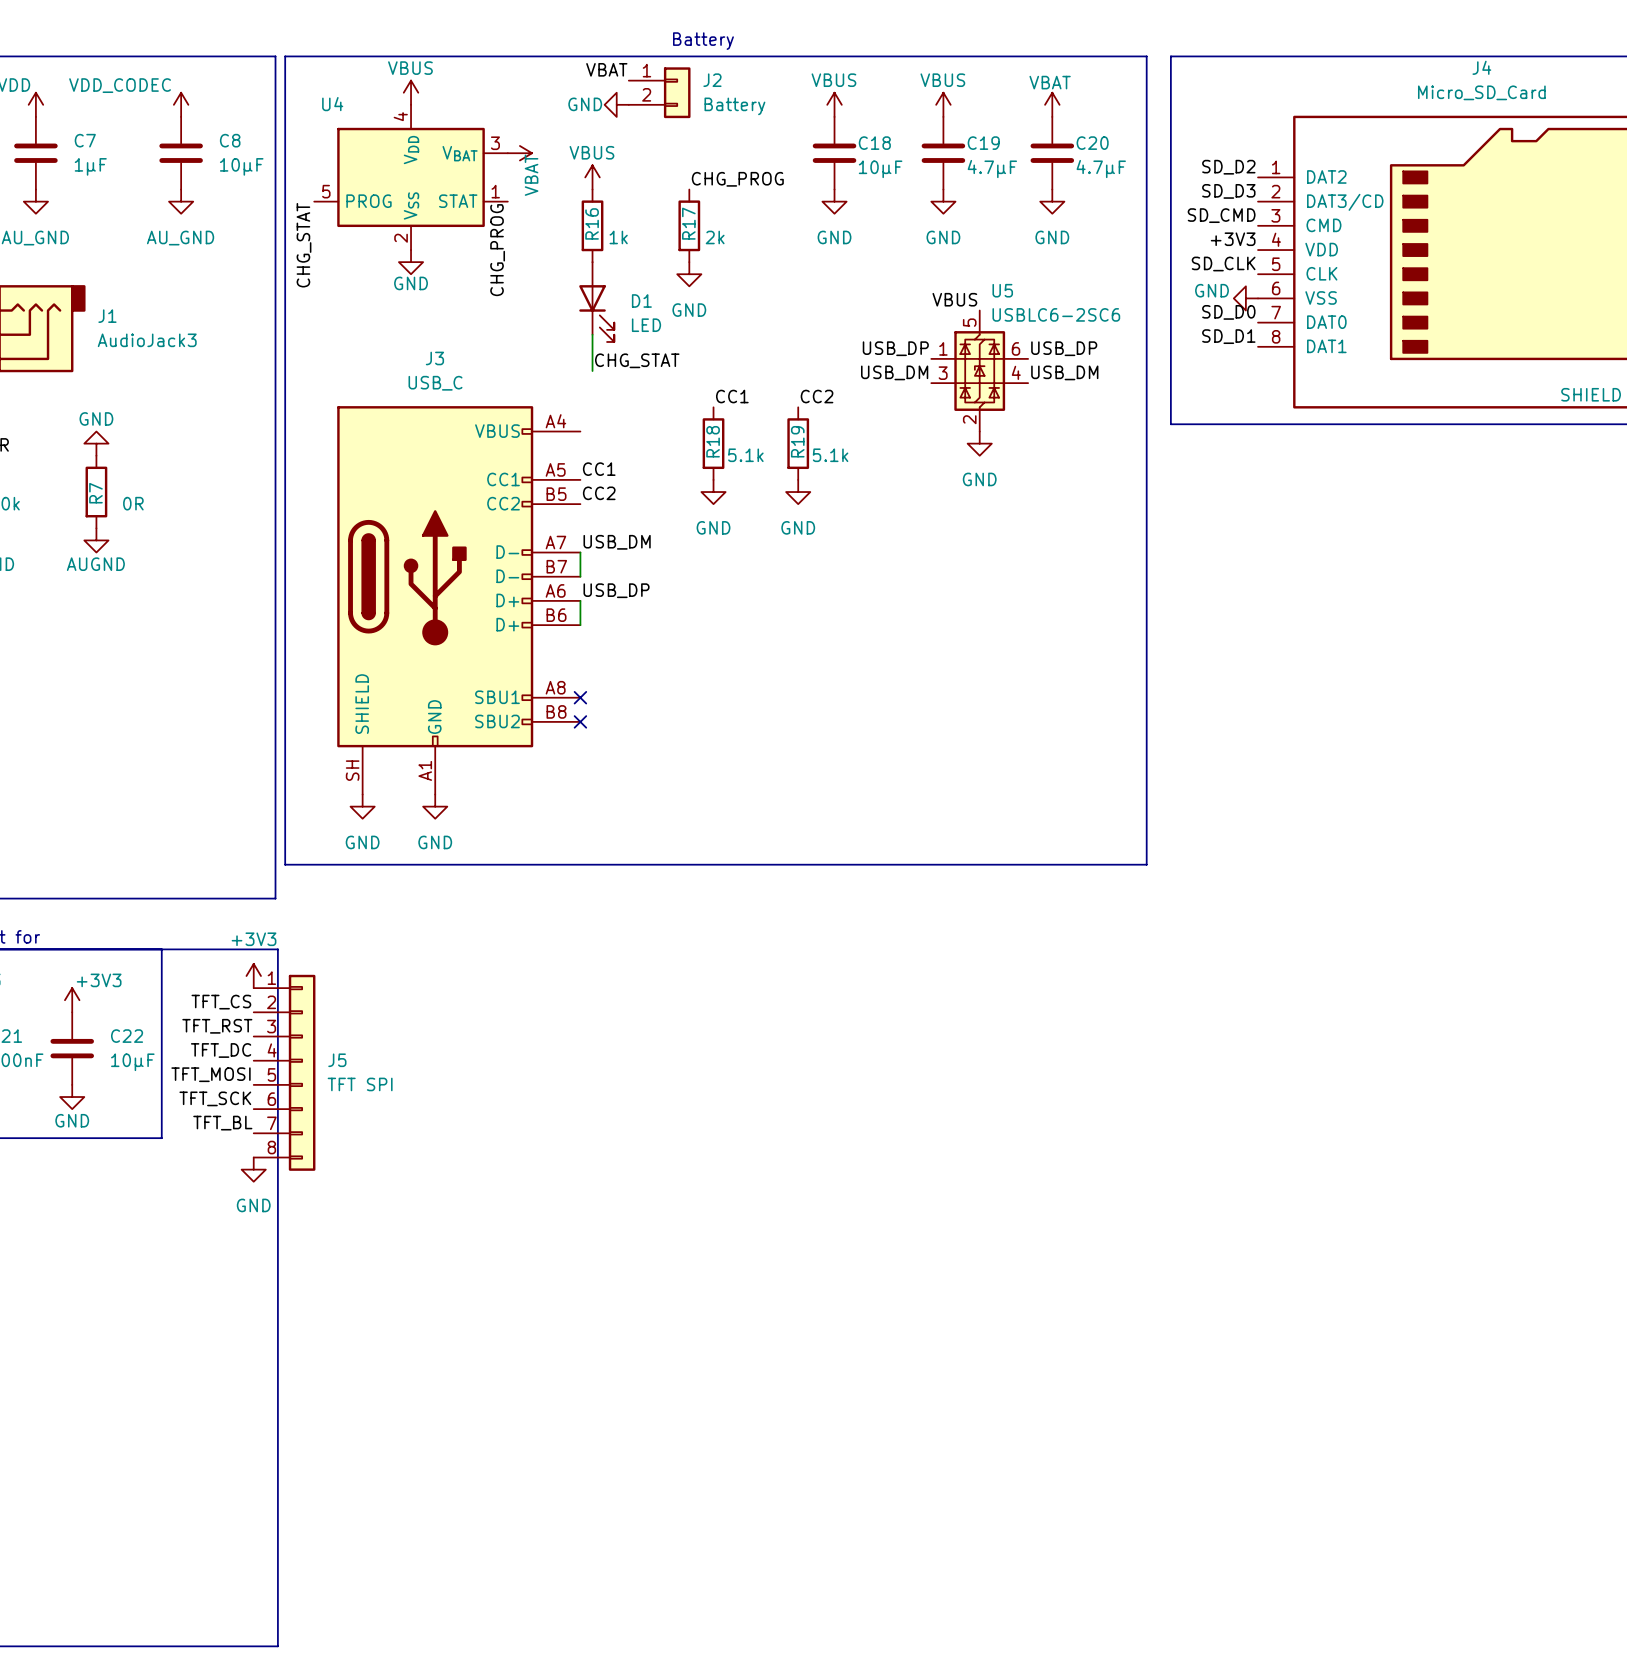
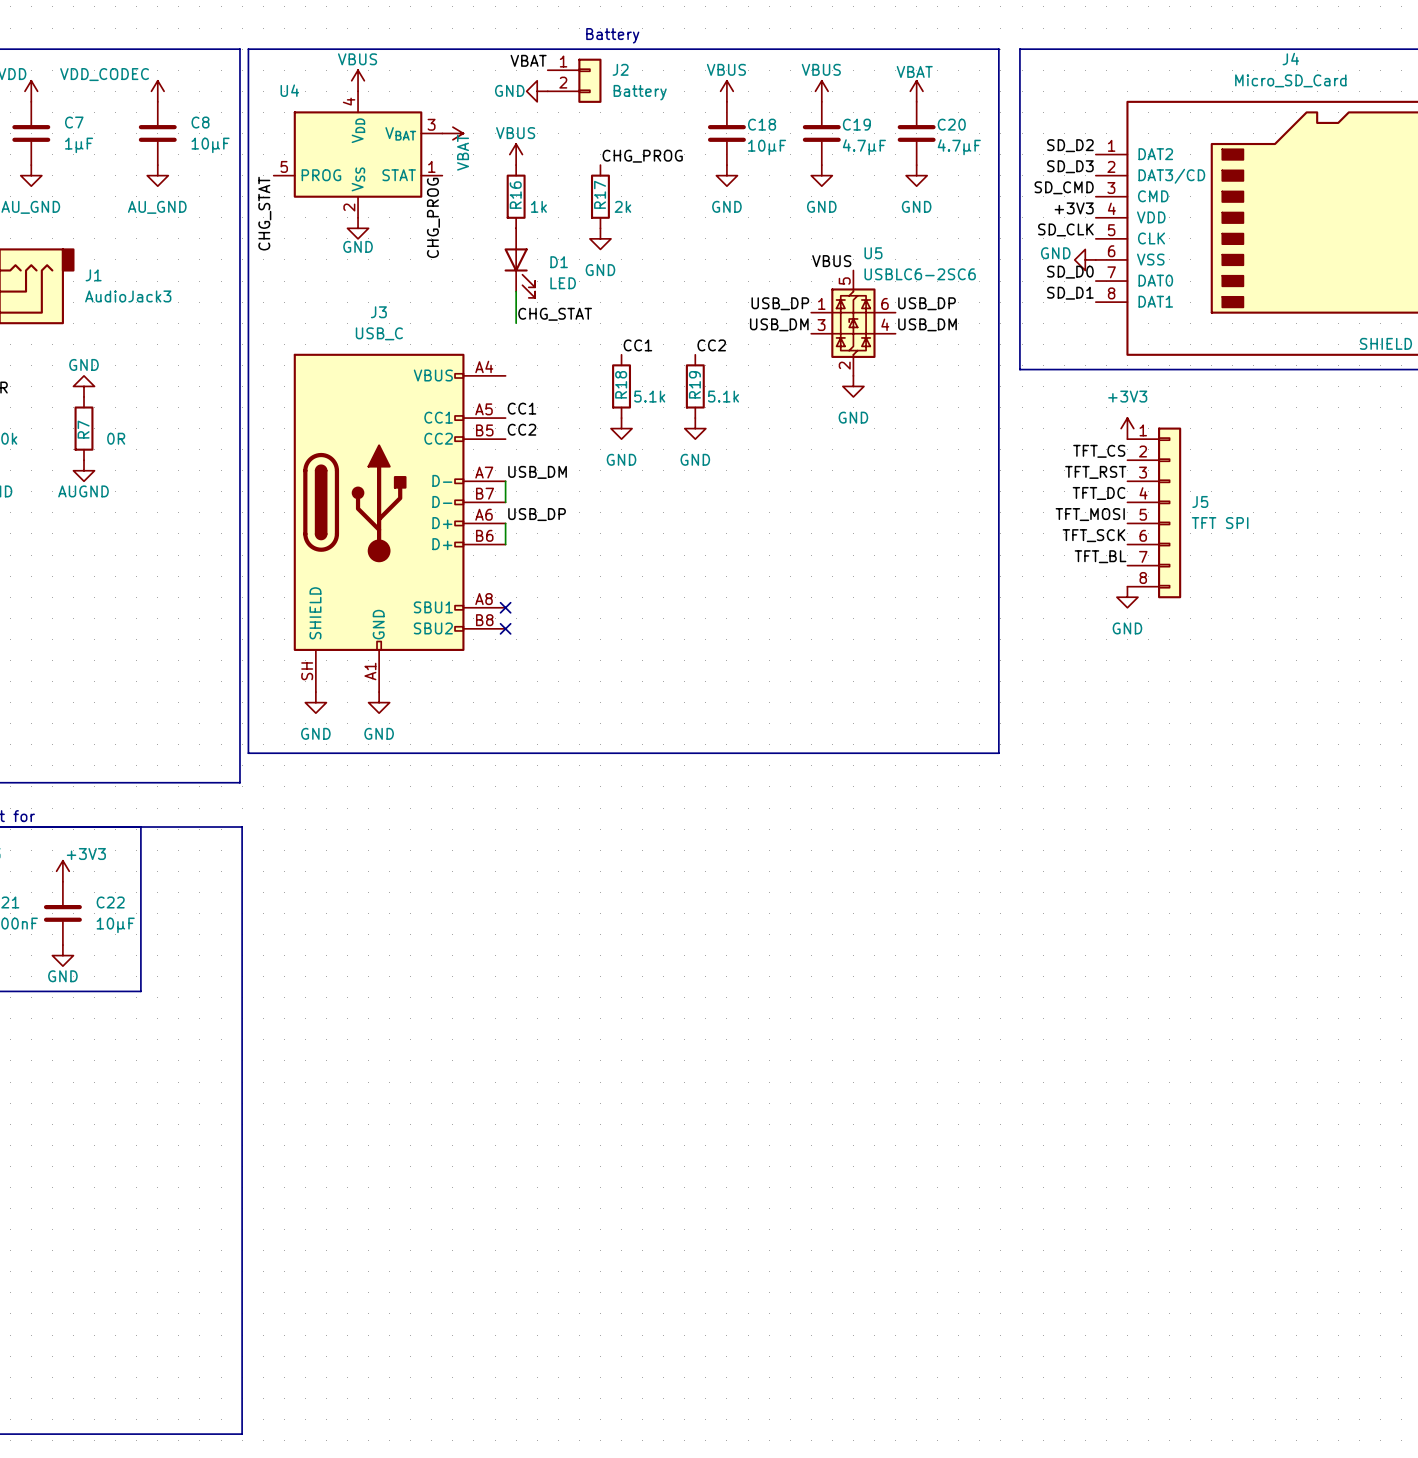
power symbol: none -> +3V3 (1127, 428)
label: none -> TFT_CS (1099, 451)
label: none -> TFT_RST (1095, 472)
label: none -> TFT_DC (1099, 493)
label: none -> TFT_MOSI (1090, 514)
label: none -> TFT_SCK (1093, 535)
label: none -> TFT_BL (1100, 556)
power symbol: none -> GND (1127, 597)
power symbol: +3V3 (253, 976) -> none
label: TFT_CS (221, 1002) -> none
label: TFT_RST (217, 1026) -> none
label: TFT_DC (221, 1050) -> none
J5 position: (284, 1072) -> (1154, 512)
label: TFT_MOSI (210, 1074) -> none
label: TFT_SCK (215, 1098) -> none
label: TFT_BL (222, 1123) -> none
power symbol: GND (253, 1169) -> none

